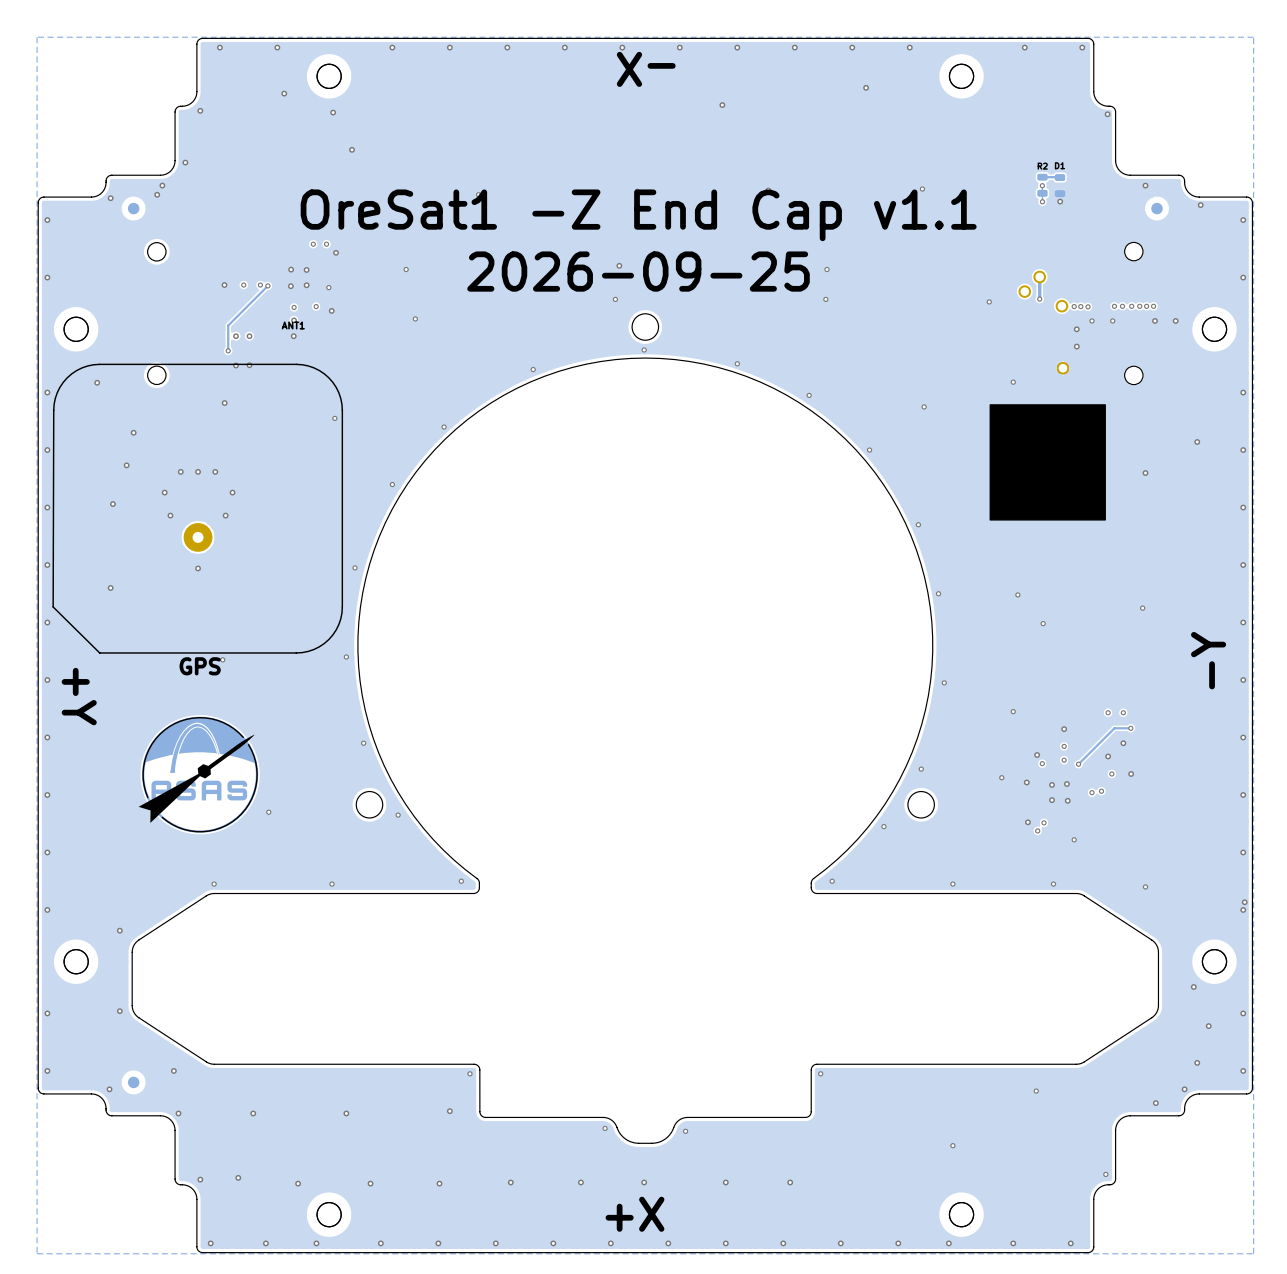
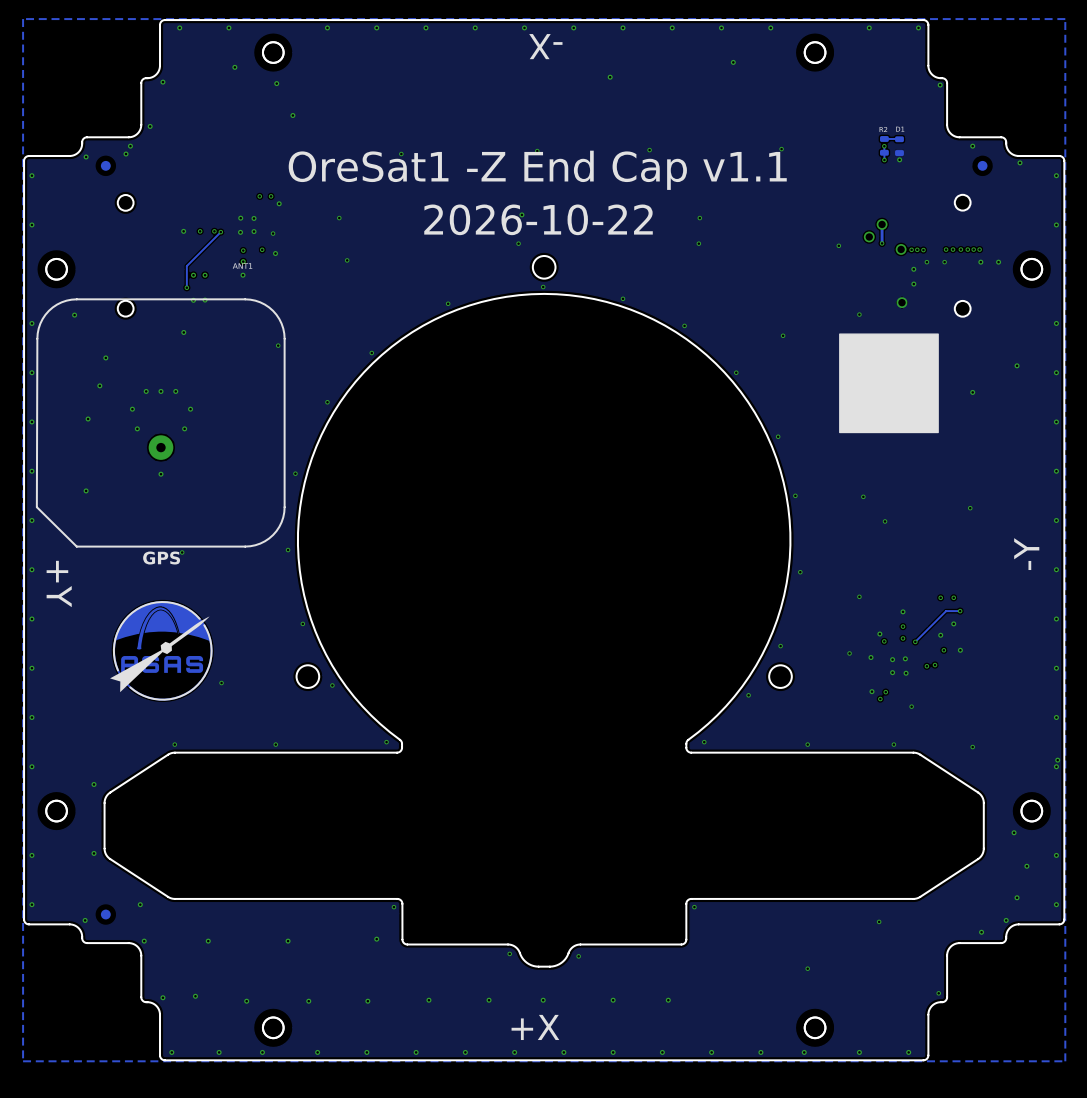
text: 2026-09-25 (638, 271) -> 2026-10-22 (538, 219)

